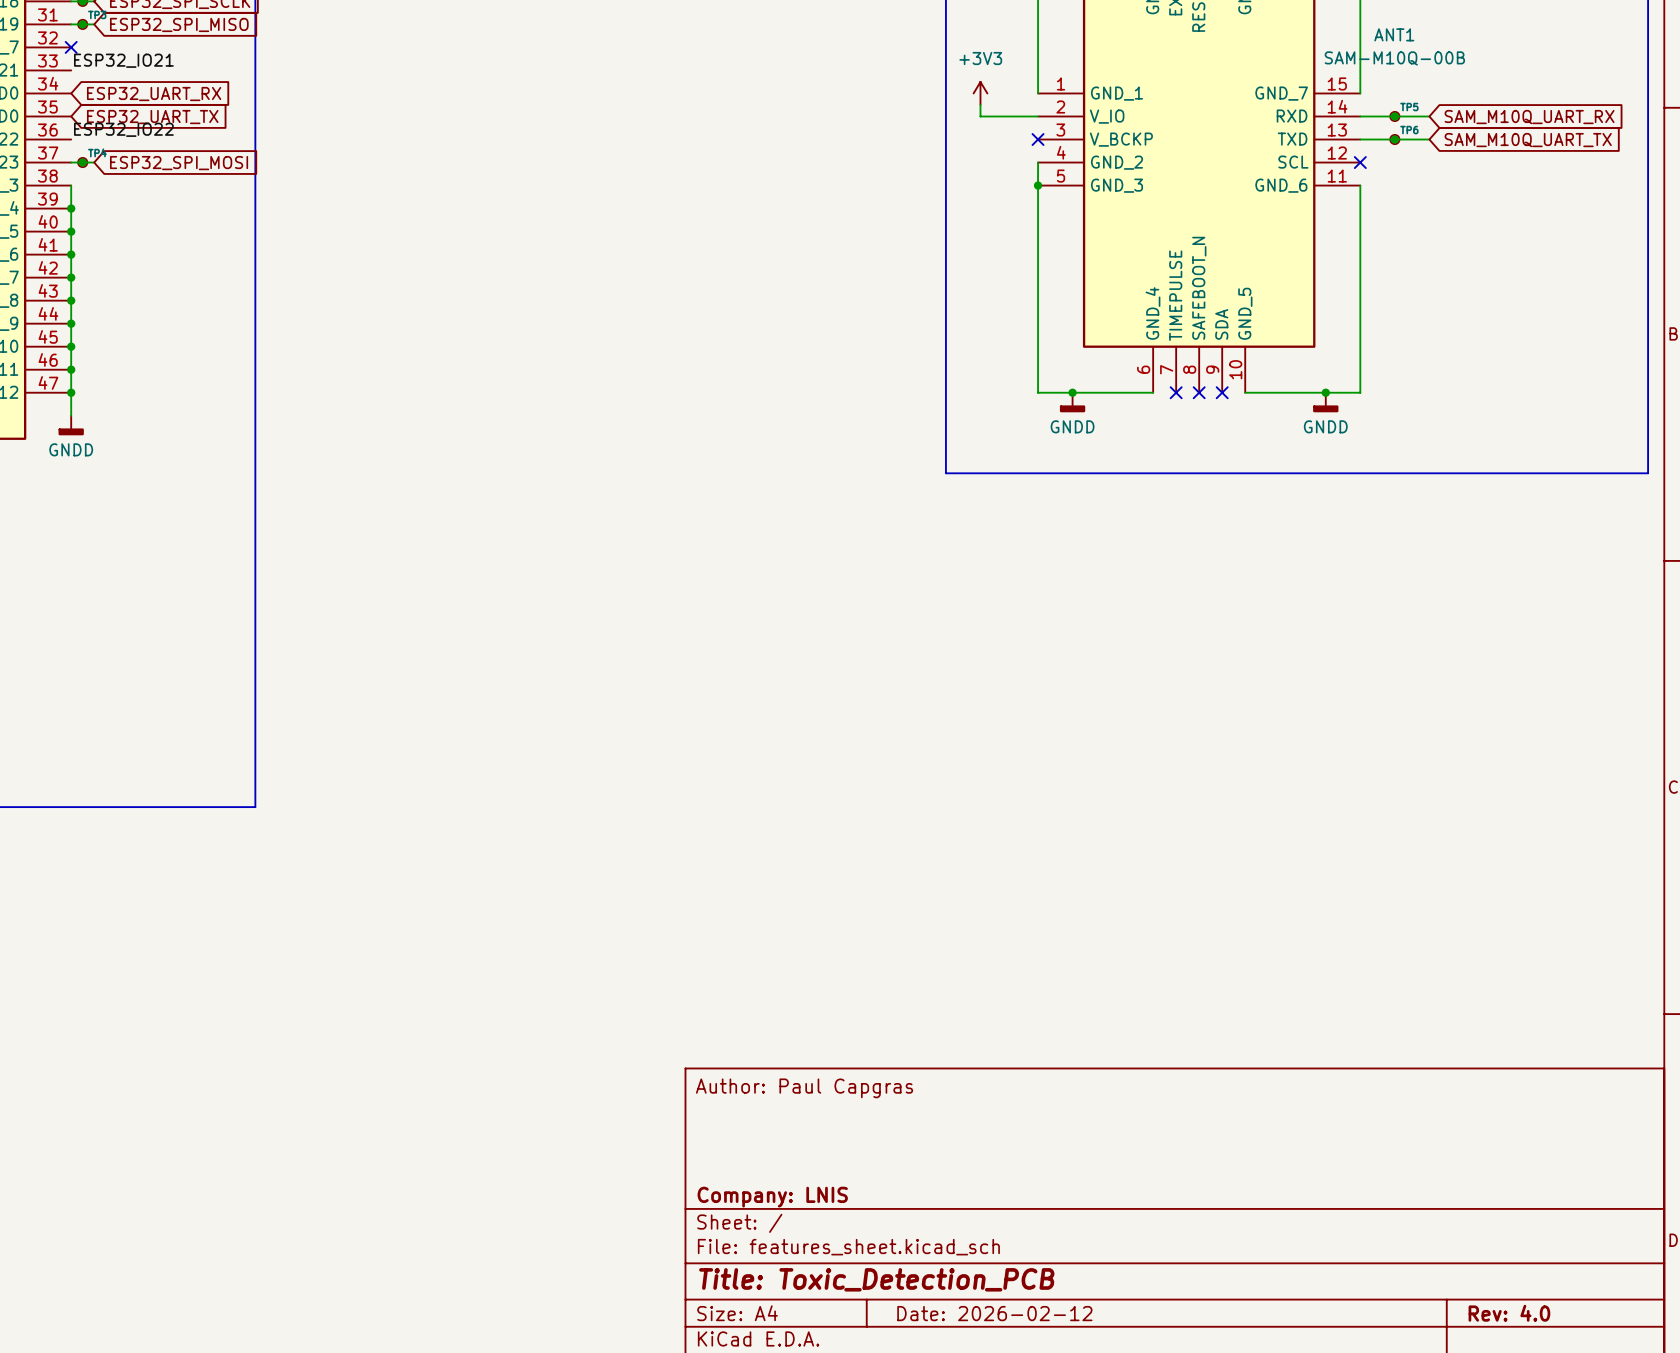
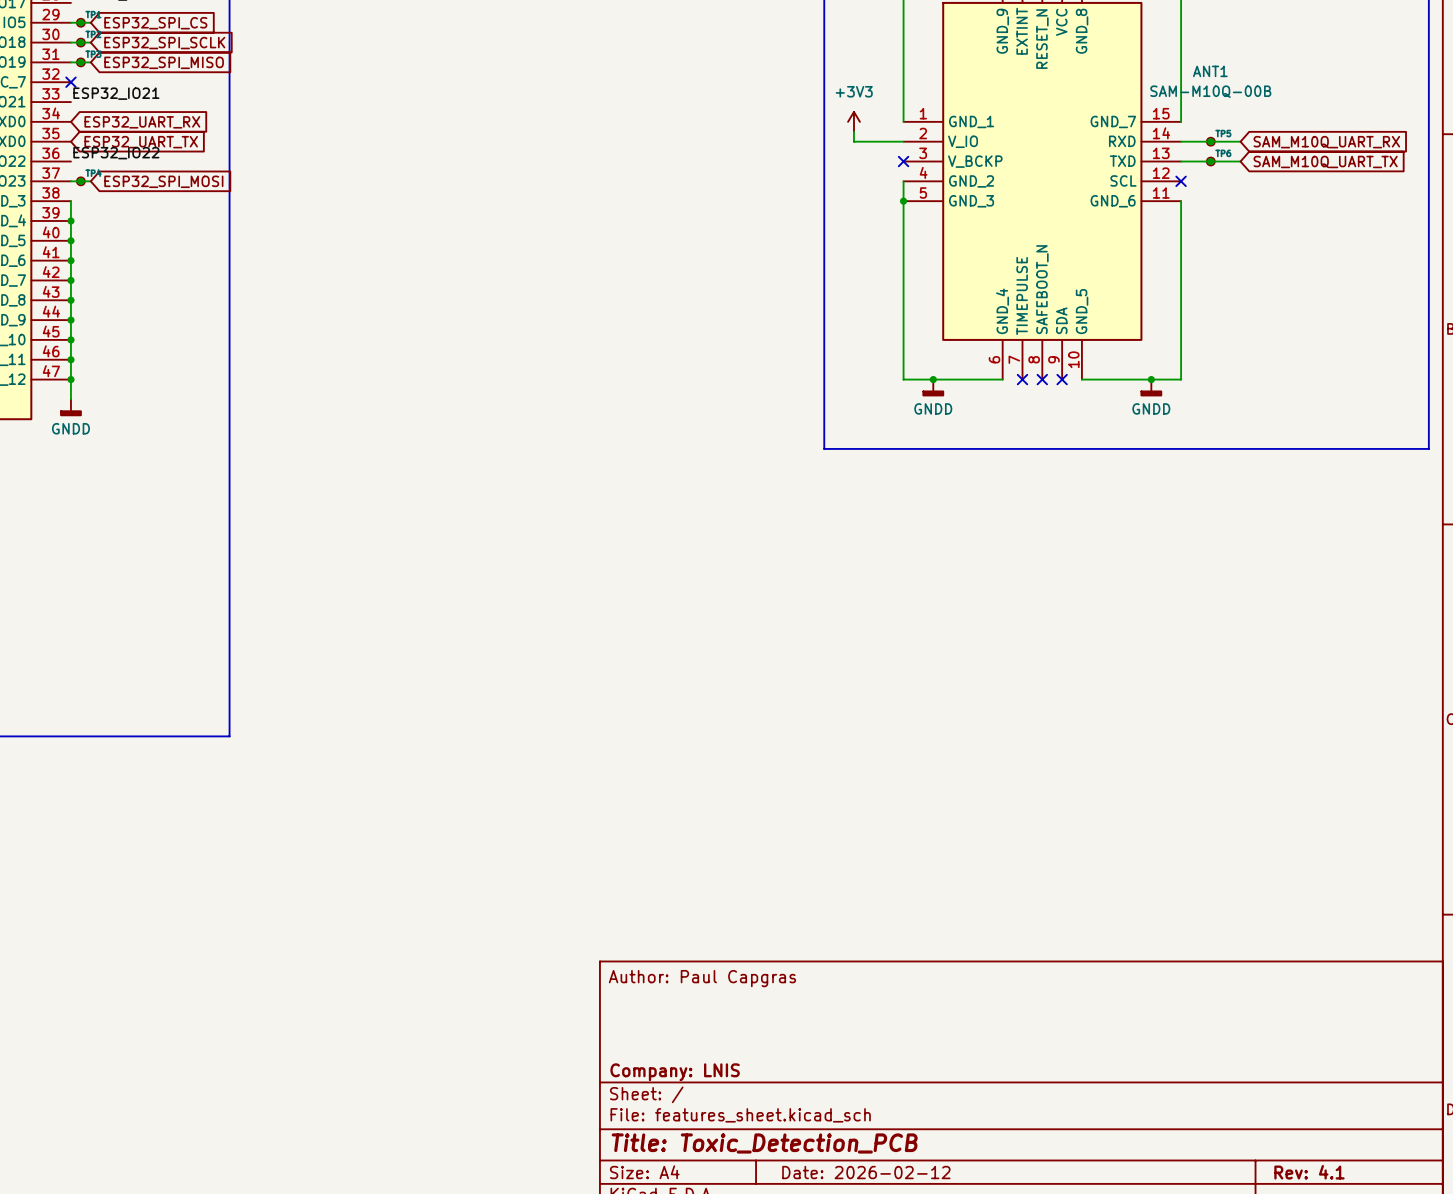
title block: Rev: 4.0 (1509, 1313) -> Rev: 4.1 (1309, 1172)

